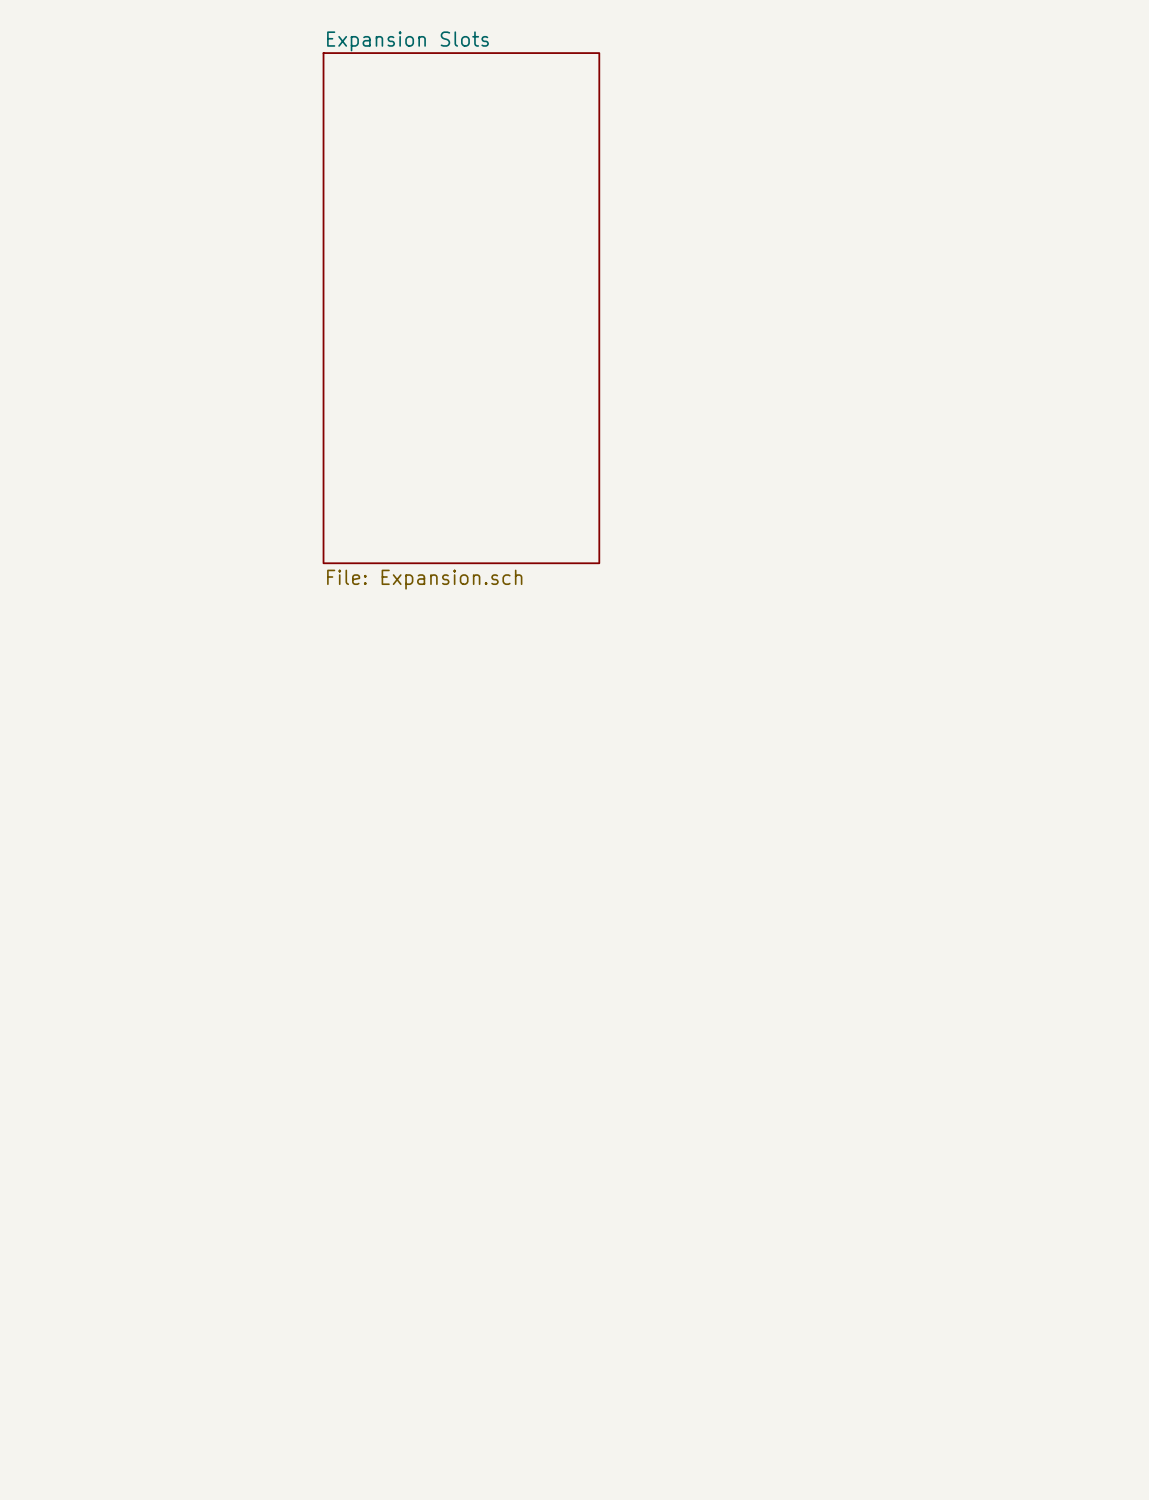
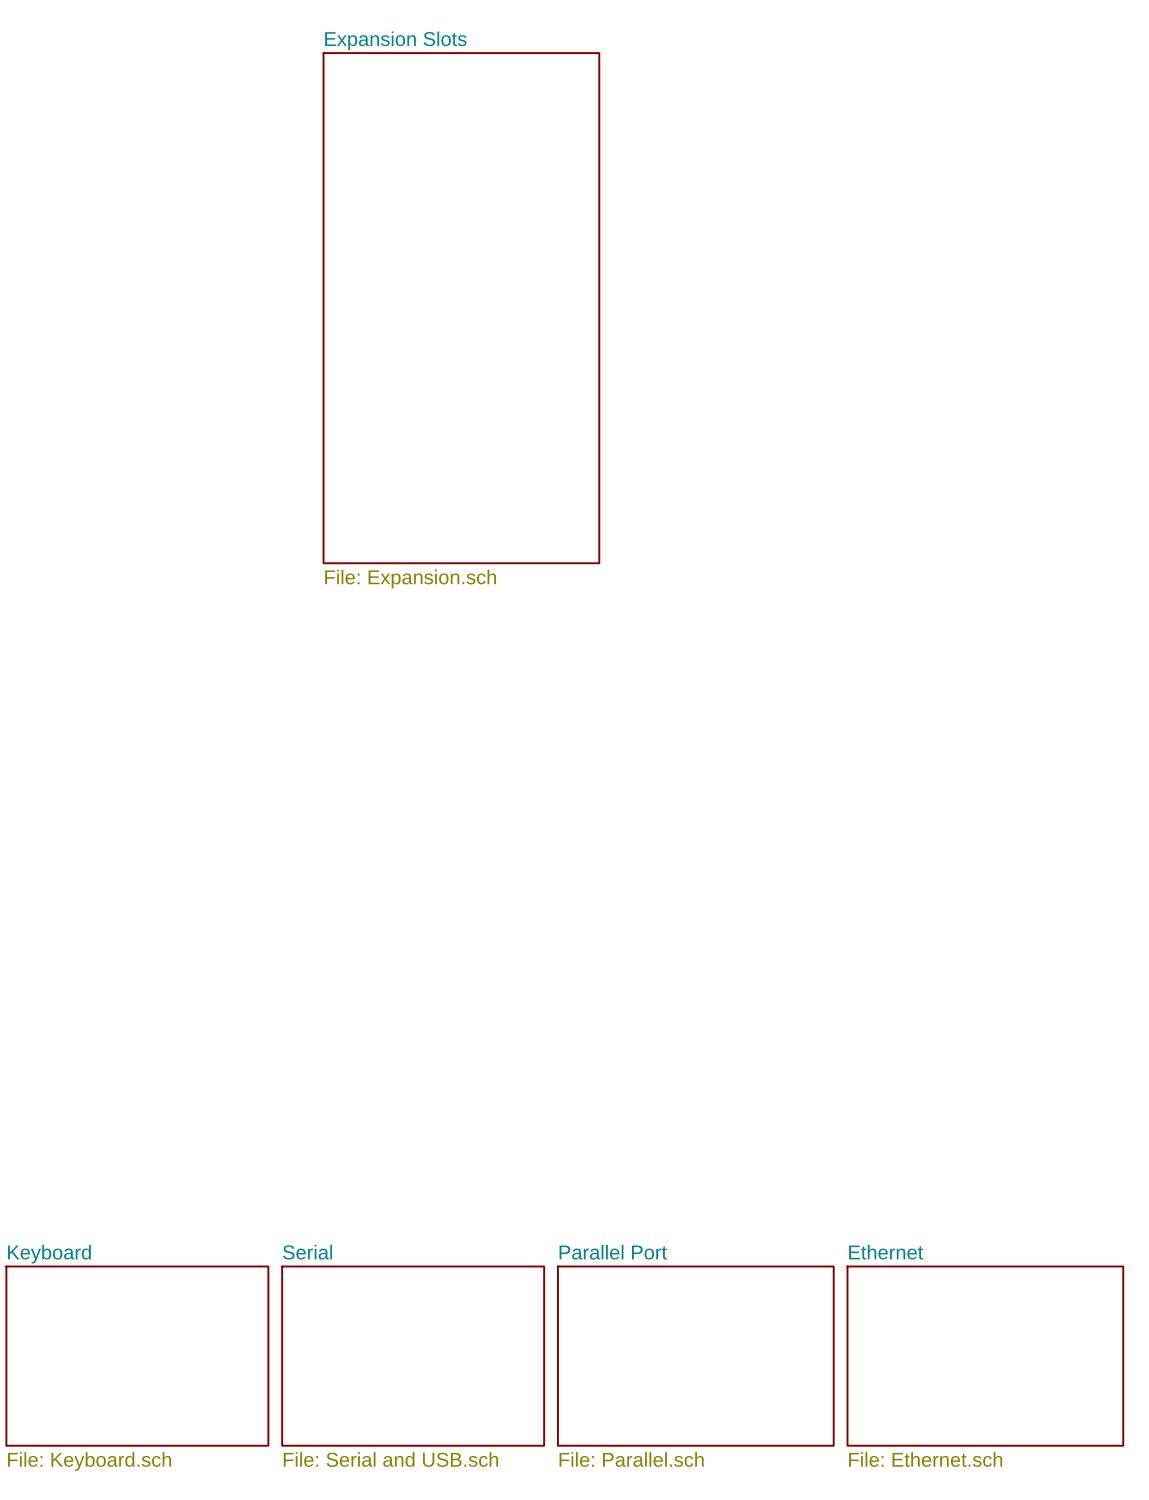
sheet Keyboard: none -> File: Keyboard.sch (137, 1356)
sheet Serial: none -> File: Serial and USB.sch (413, 1356)
sheet Parallel Port: none -> File: Parallel.sch (695, 1356)
sheet Ethernet: none -> File: Ethernet.sch (985, 1356)

